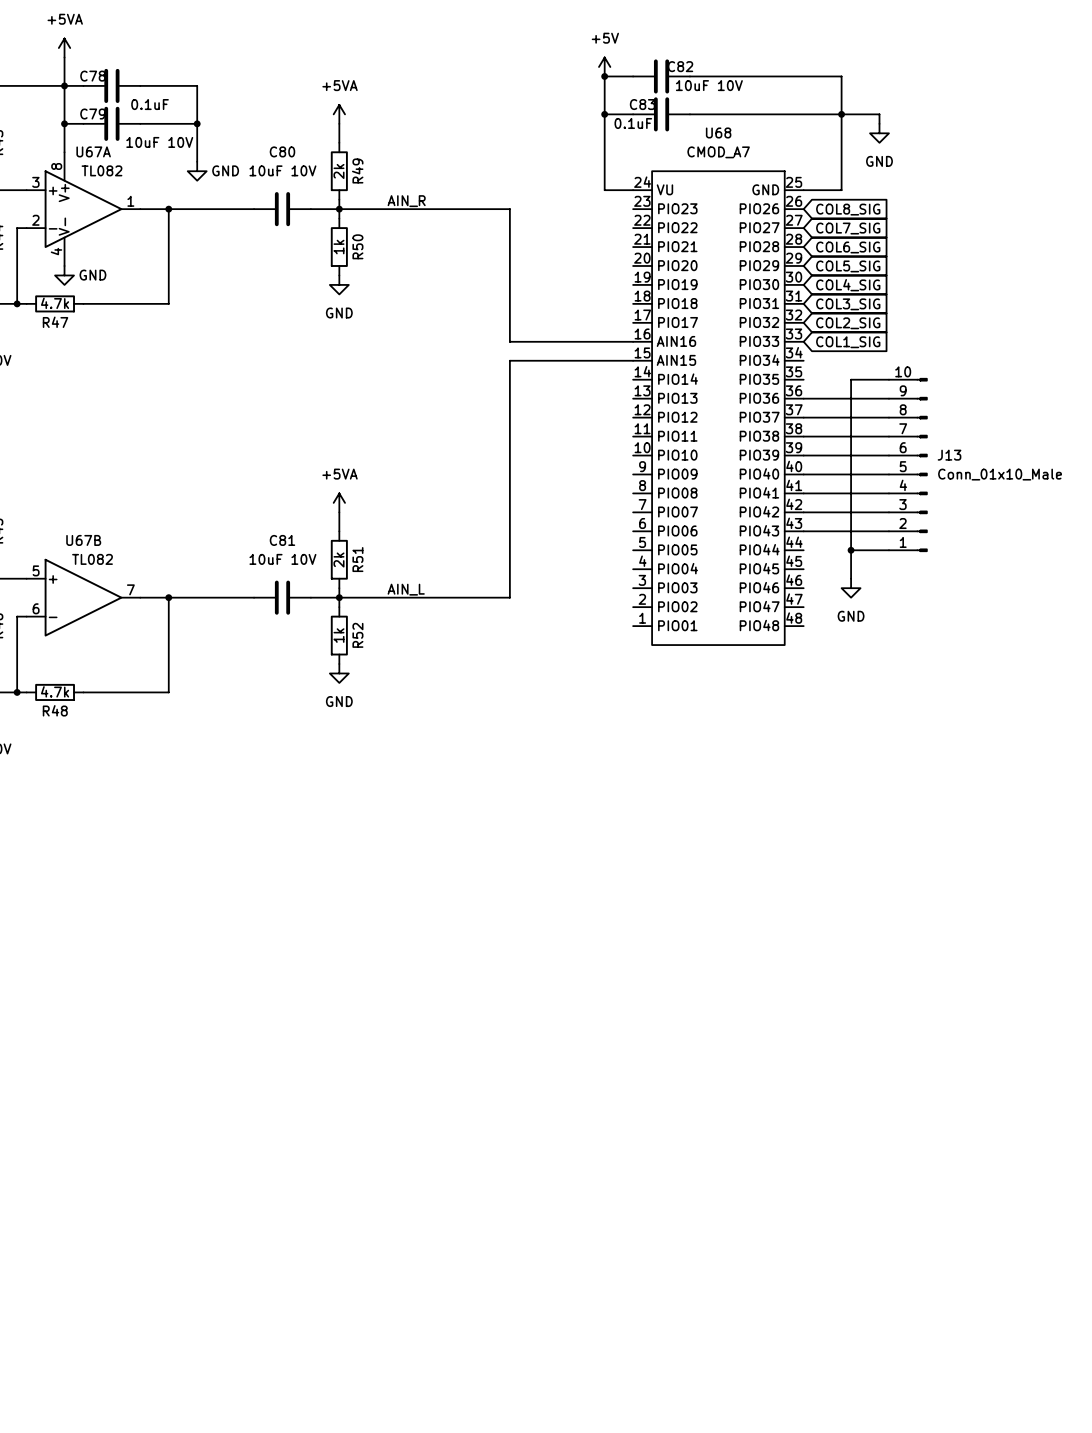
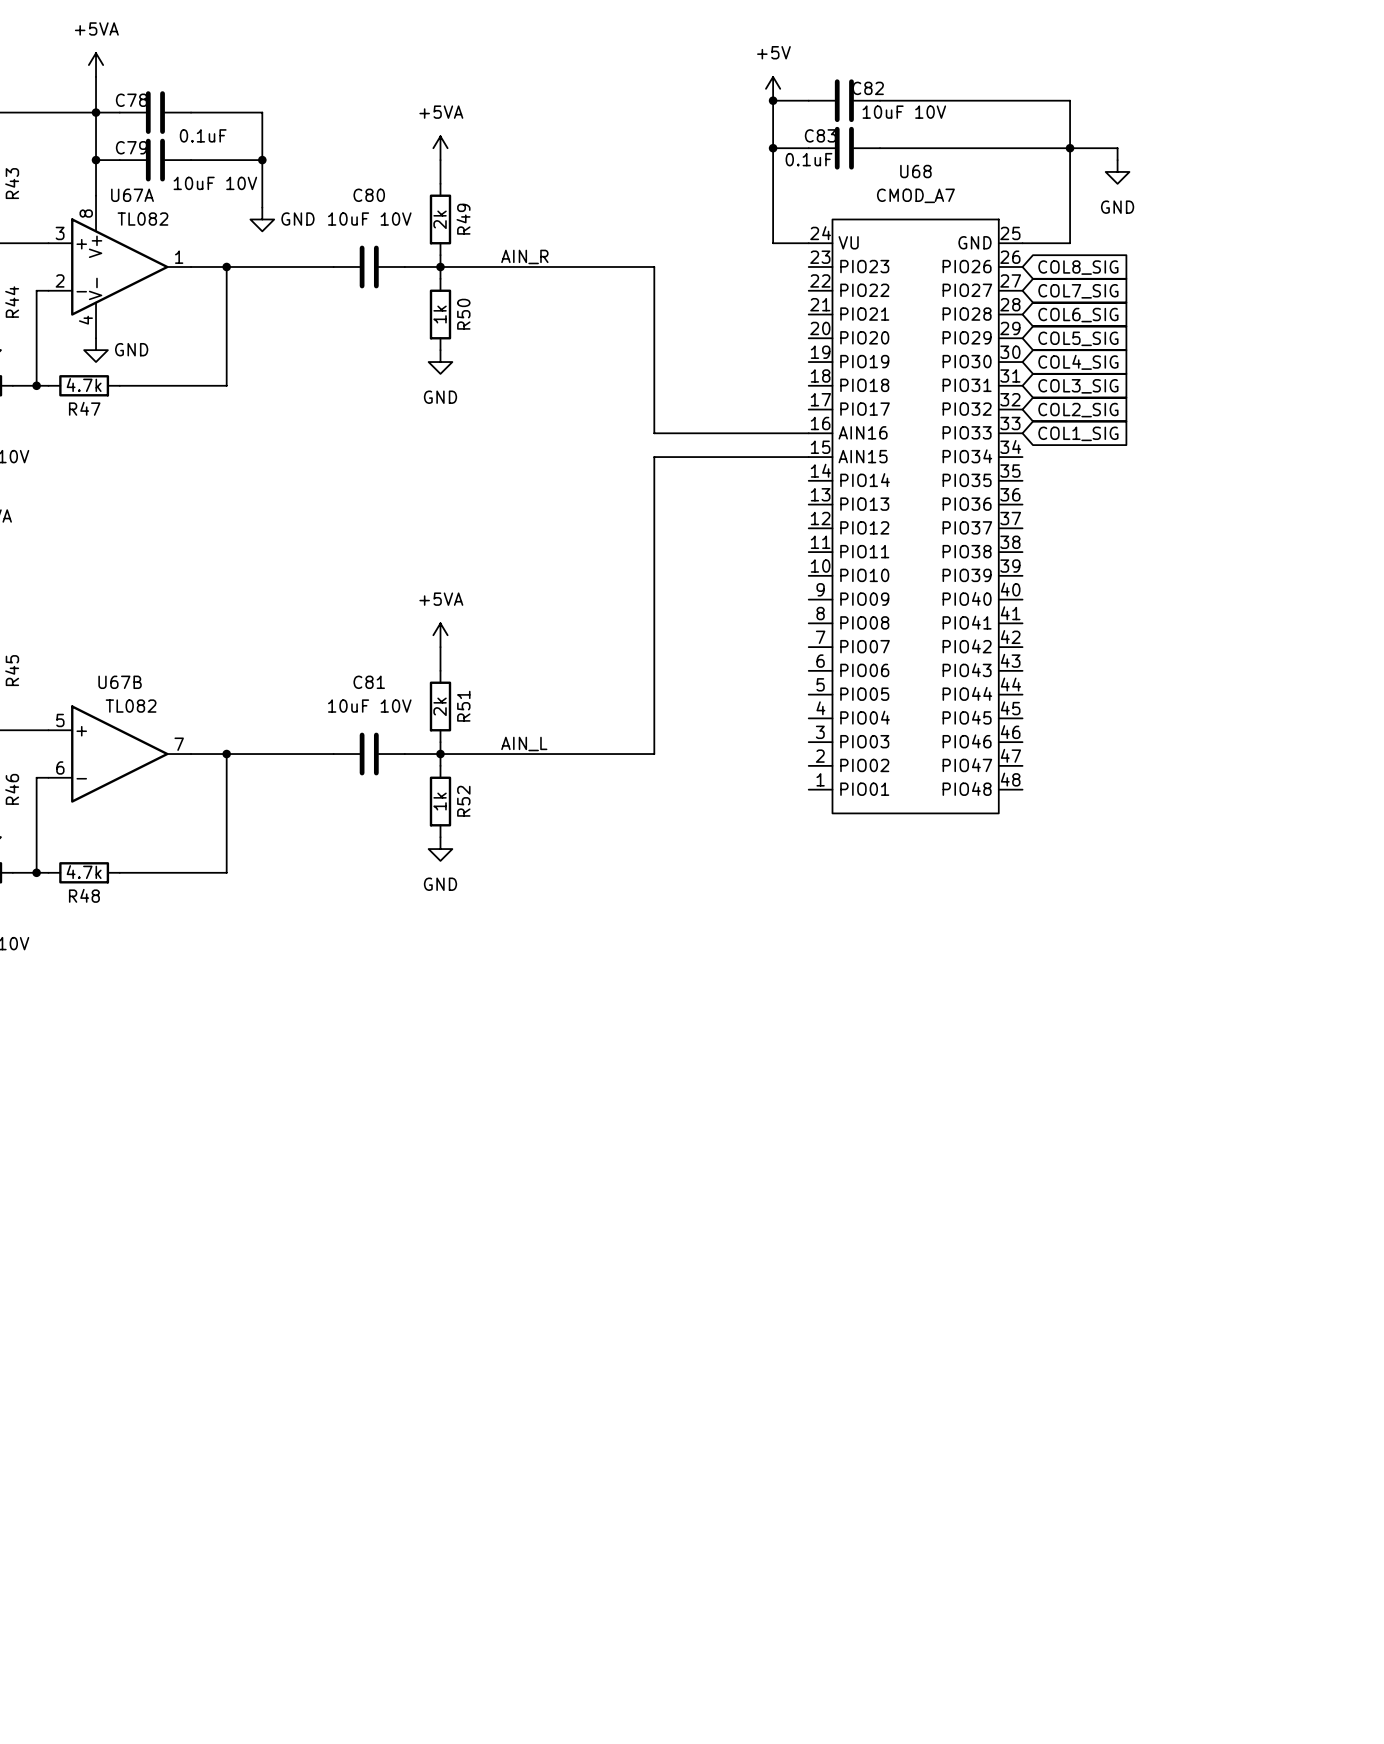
wire: (888, 379) (851, 379) (851, 578) -> none
wire: (803, 398) (888, 398) -> none
wire: (803, 417) (888, 417) -> none
wire: (803, 436) (888, 436) -> none
wire: (803, 455) (888, 455) -> none
J13: Conn_01x10_Male (908, 464) -> none
wire: (803, 474) (888, 474) -> none
wire: (803, 493) (888, 493) -> none
wire: (803, 512) (888, 512) -> none
wire: (803, 531) (888, 531) -> none
wire: (851, 550) (888, 550) -> none
junction: (851, 550) -> none
power symbol: GND (851, 588) -> none

